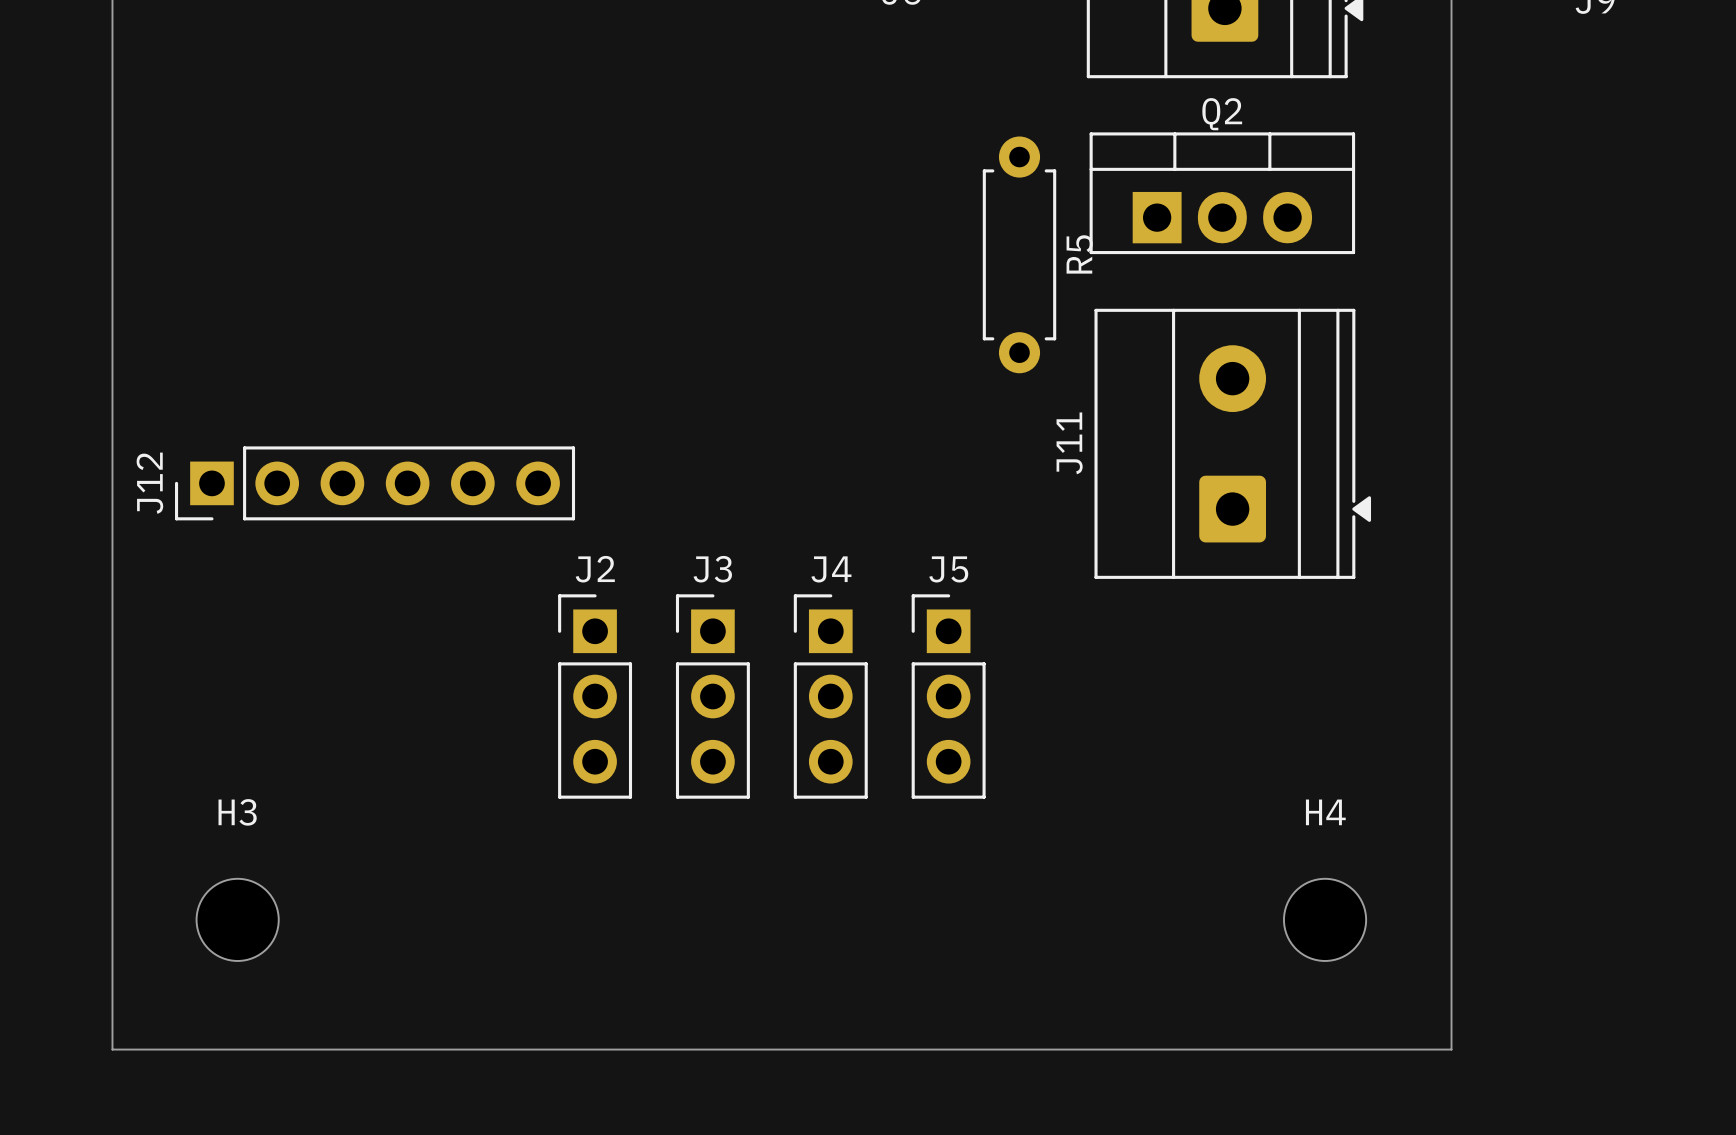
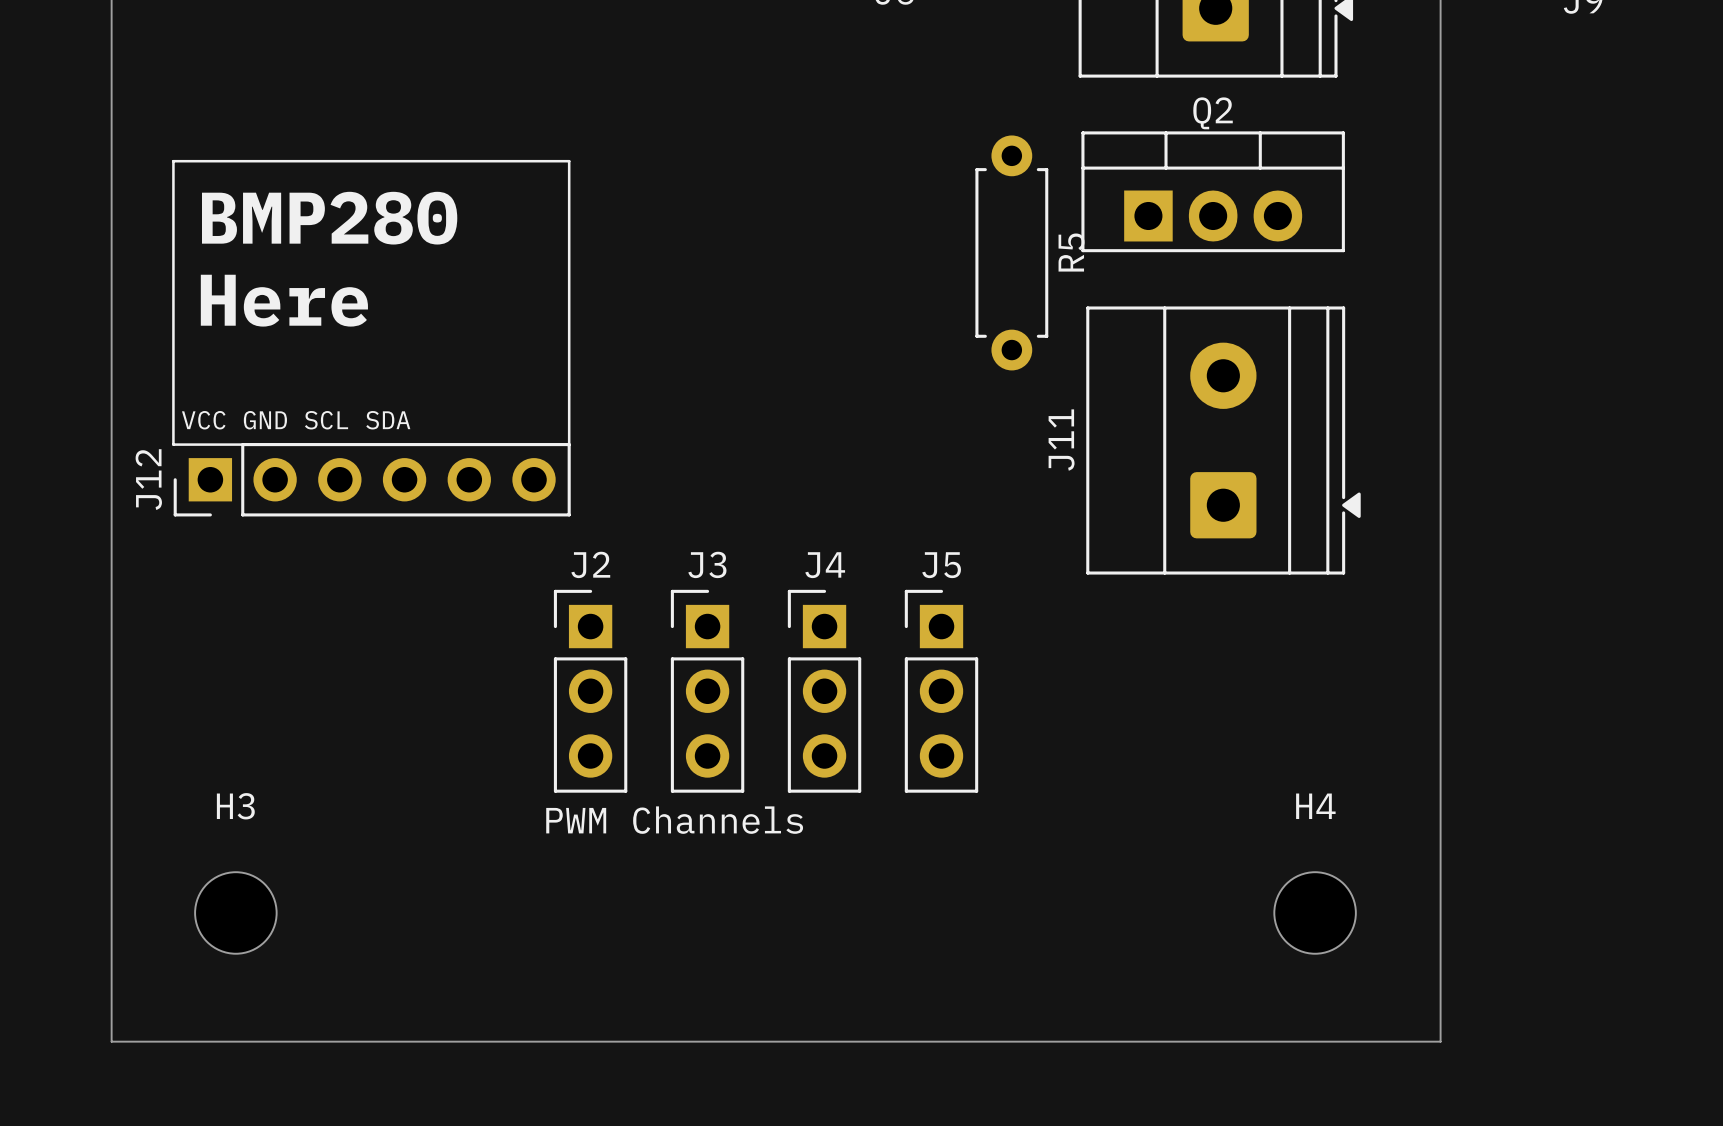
line: none -> (173, 161) (569, 161) (569, 444) (173, 444) (173, 161)
text: none -> BMP280 (329, 218)
text: none -> Here (284, 300)
text: none -> VCC GND SCL SDA (296, 420)
text: none -> PWM Channels (674, 820)

